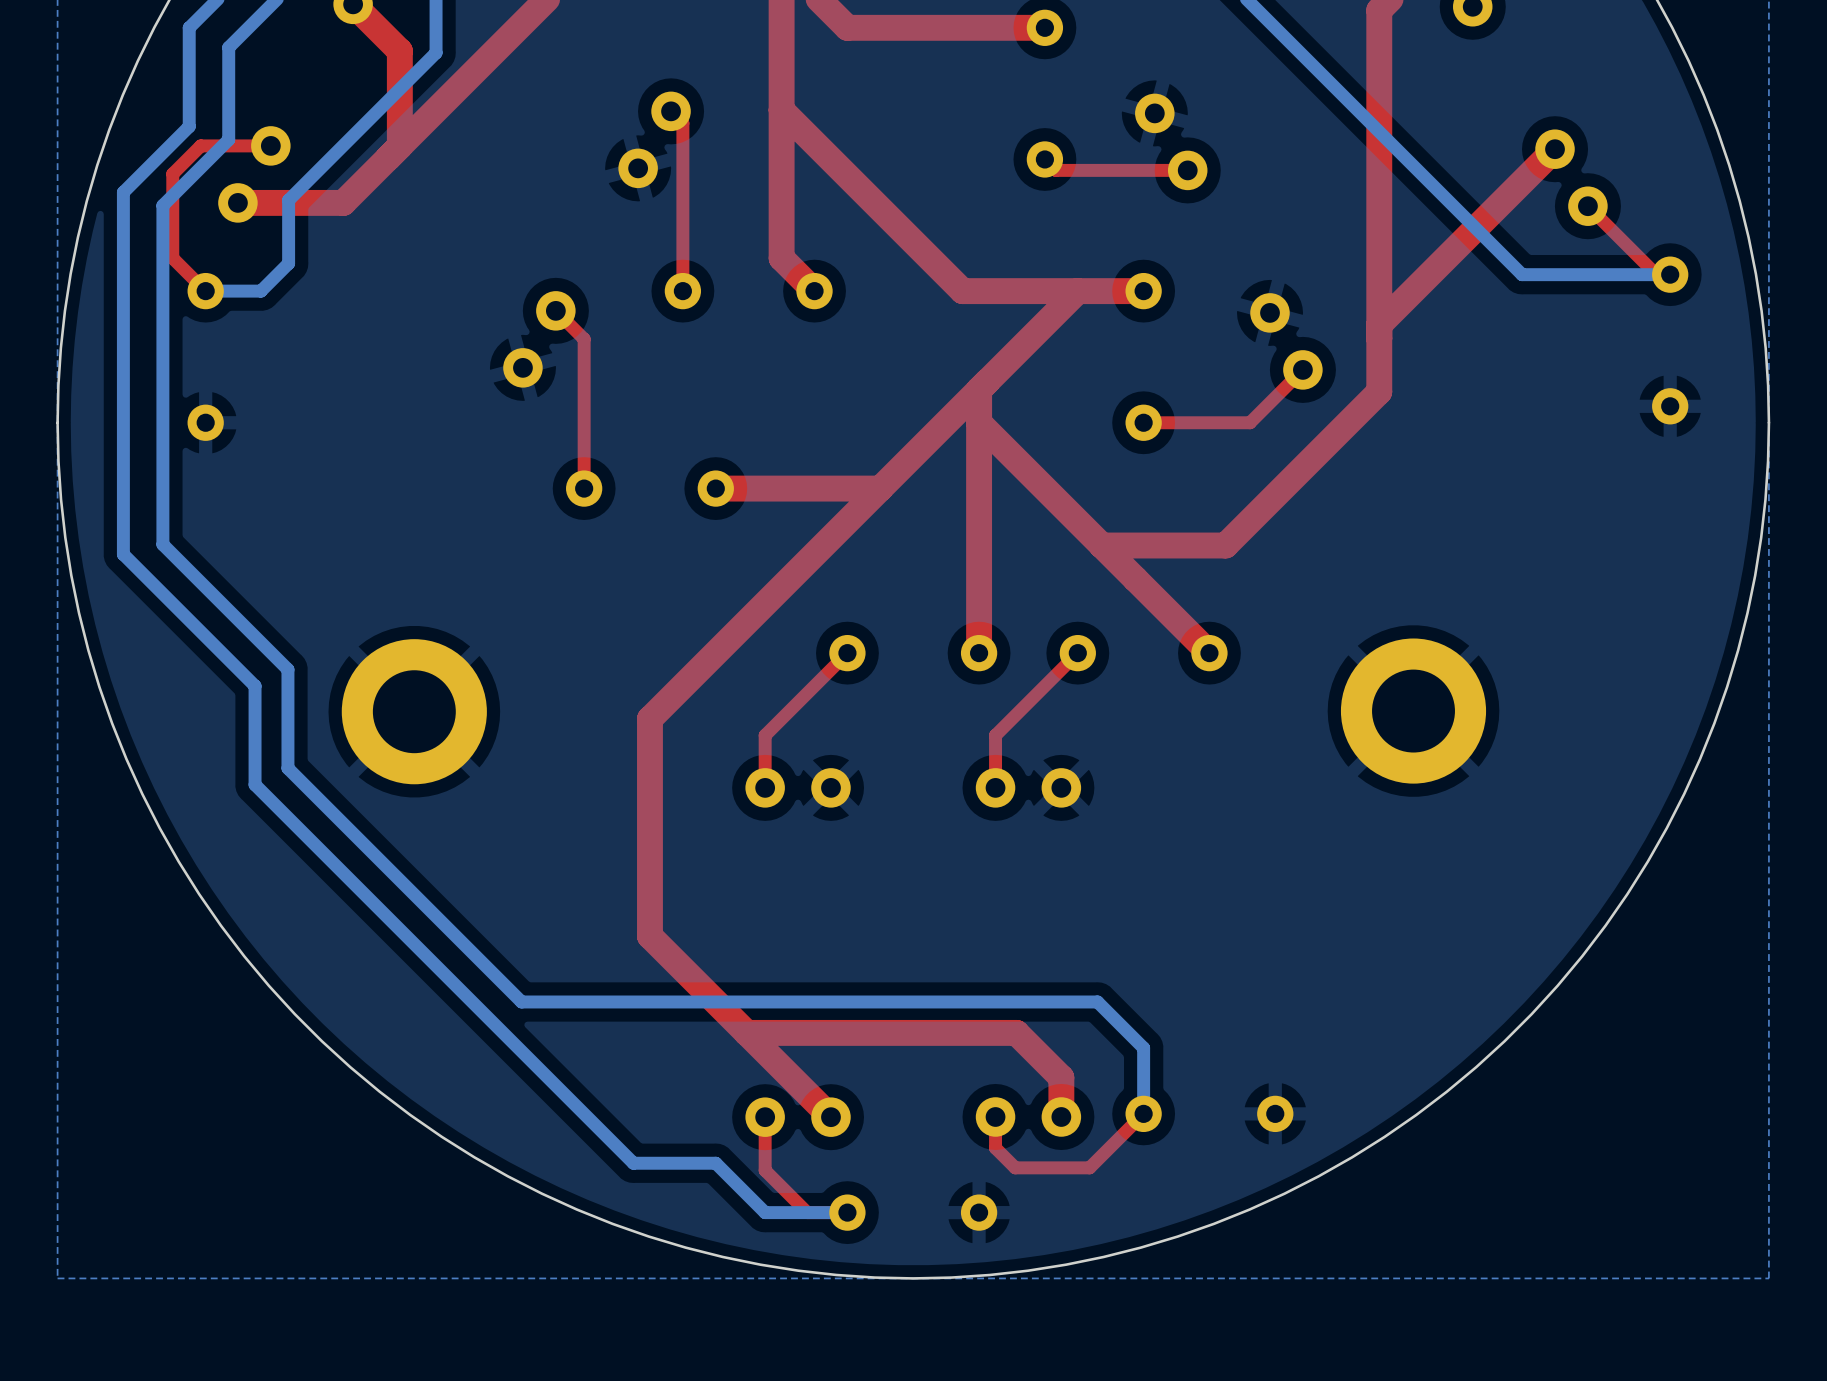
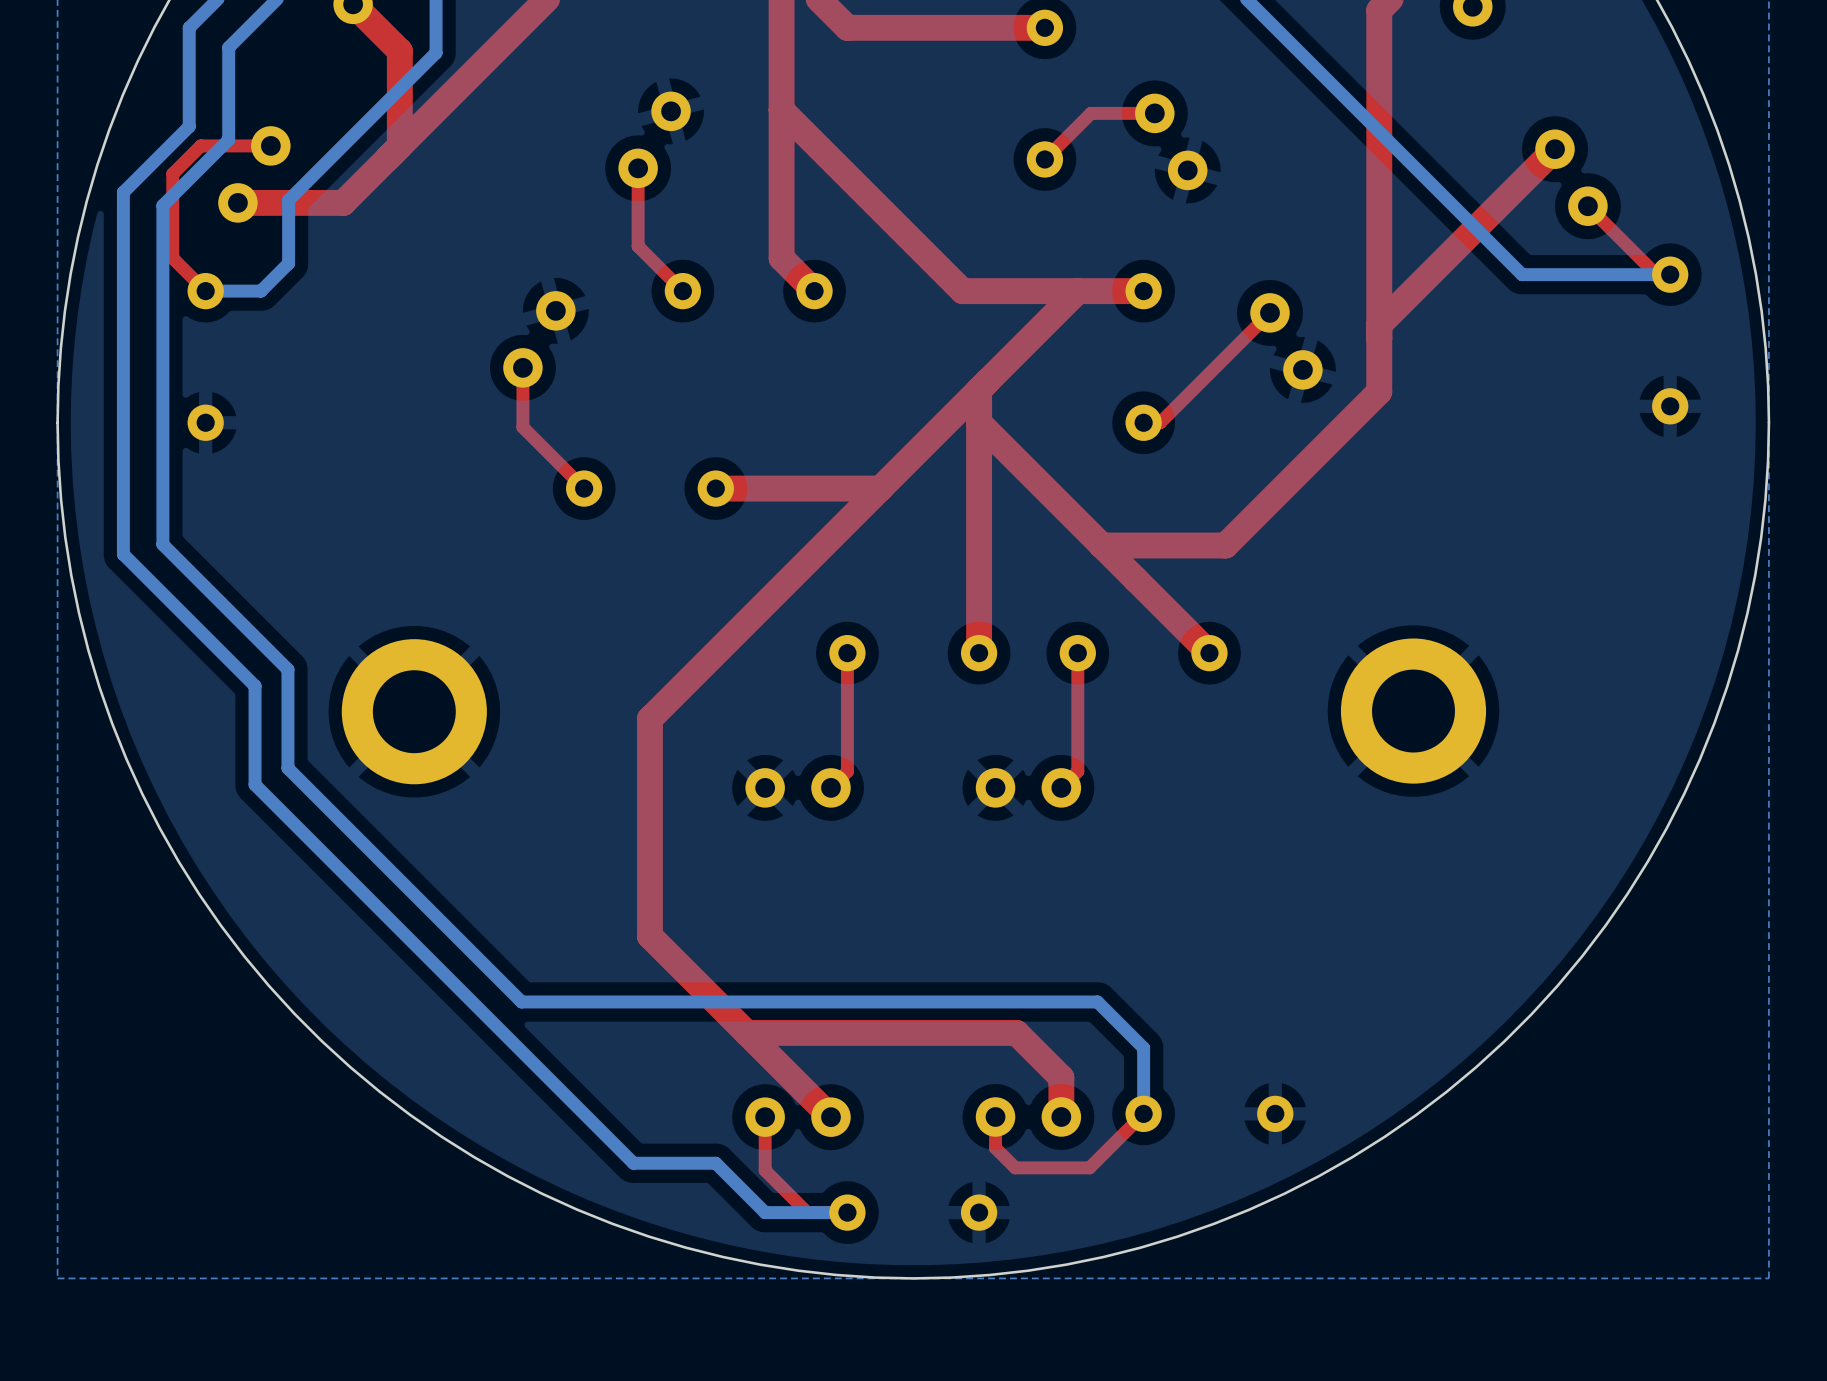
top track: (671, 111) (682, 123) (682, 291) -> (638, 168) (638, 246) (682, 291)
top track: (1044, 159) (1055, 170) (1187, 170) -> (1044, 159) (1090, 113) (1154, 113)
top track: (555, 310) (584, 339) (584, 488) -> (522, 367) (522, 427) (584, 488)
top track: (1302, 369) (1250, 422) (1160, 422) -> (1270, 312) (1160, 422)
top track: (847, 653) (765, 735) (765, 787) -> (847, 653) (847, 771) (830, 787)
top track: (1077, 653) (995, 735) (995, 787) -> (1077, 653) (1077, 771) (1061, 787)

